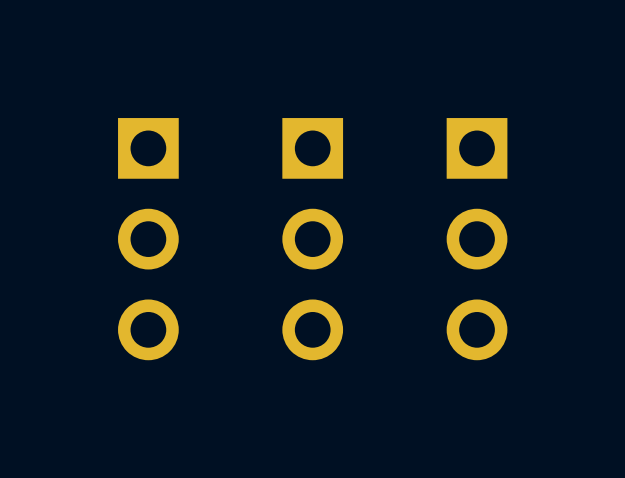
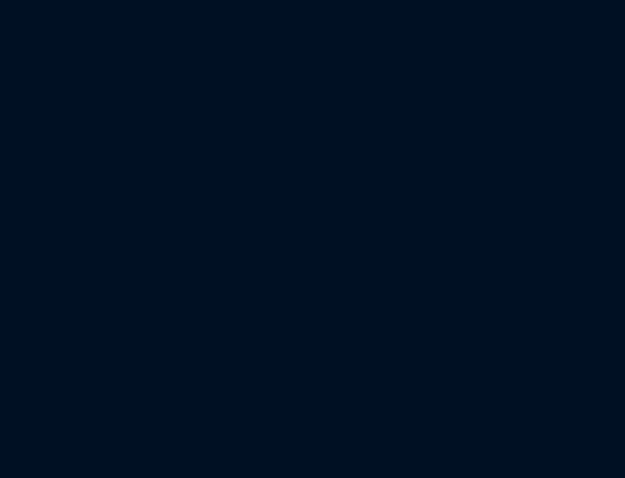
part: (148, 239) -> none
part: (312, 239) -> none
part: (477, 239) -> none

